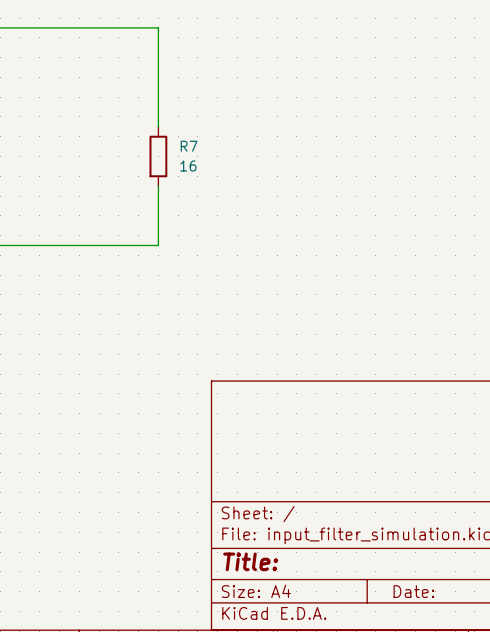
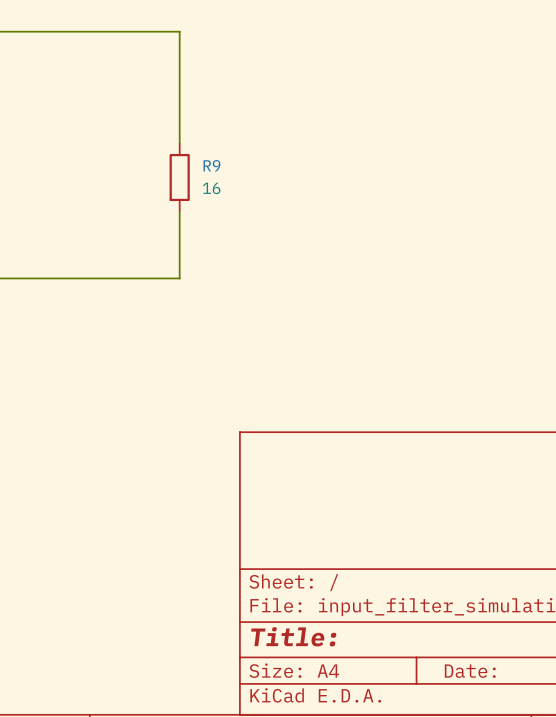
R7 name: R7 (189, 146) -> R9 (211, 165)

